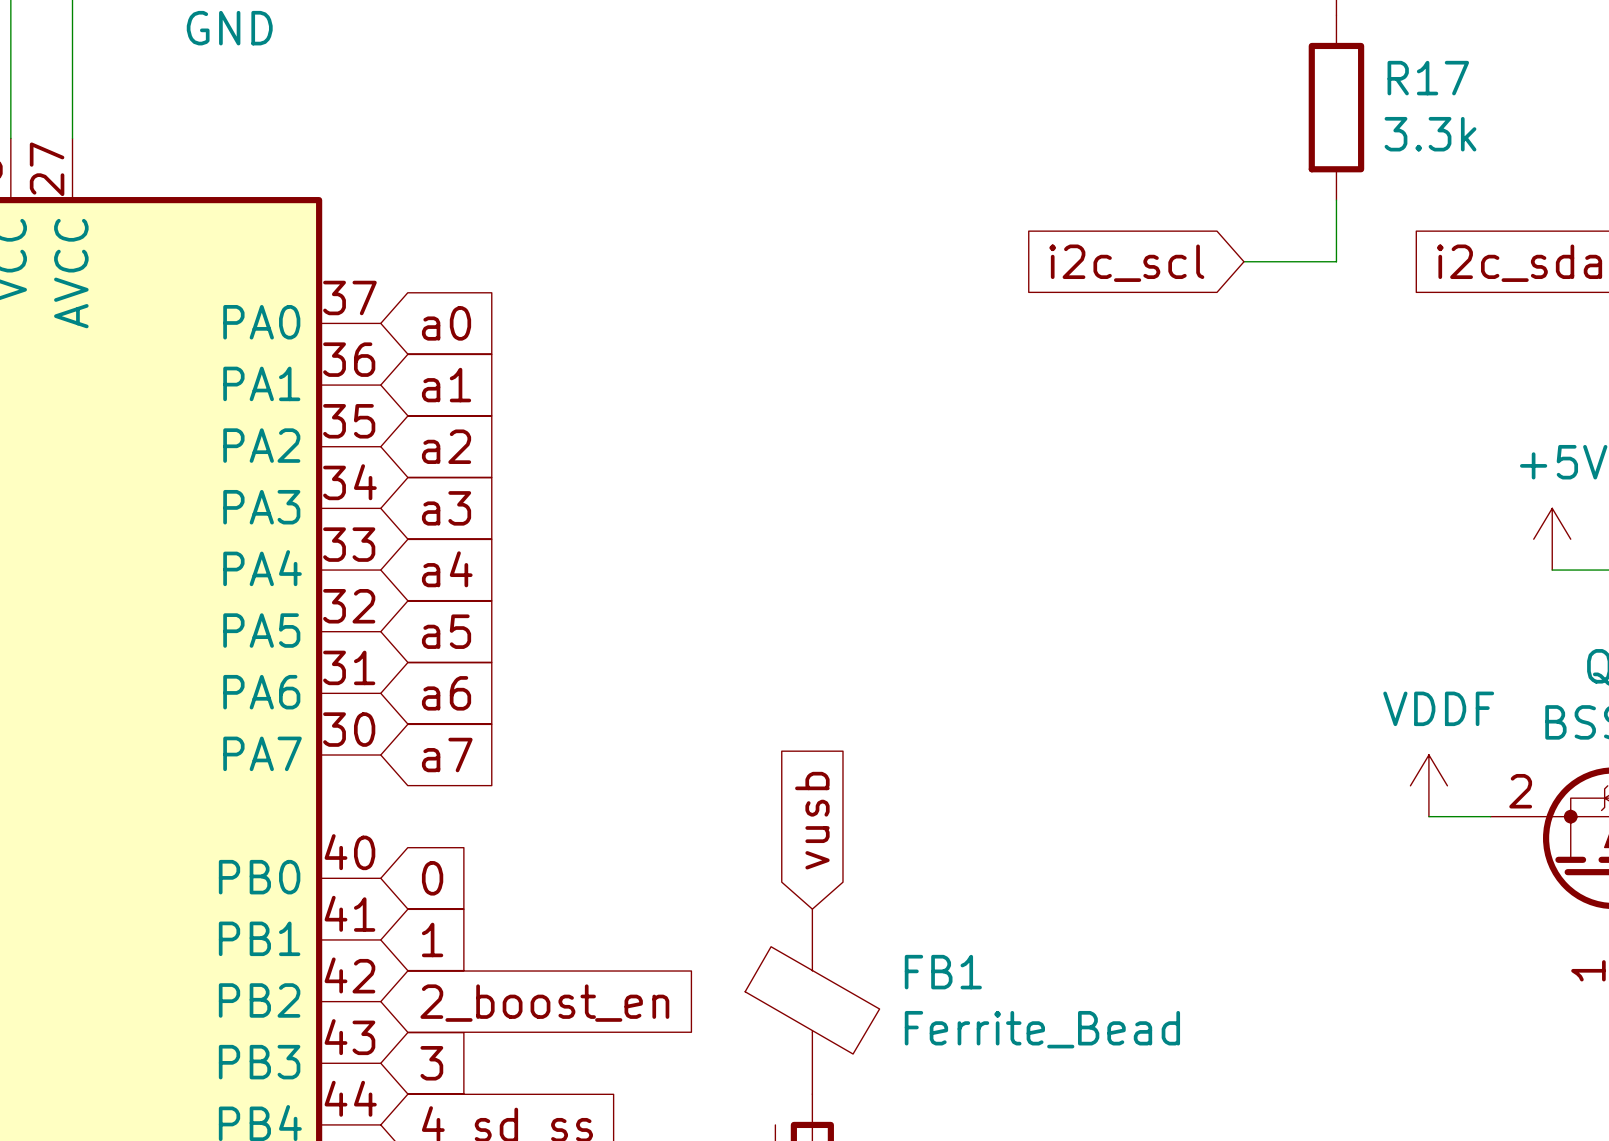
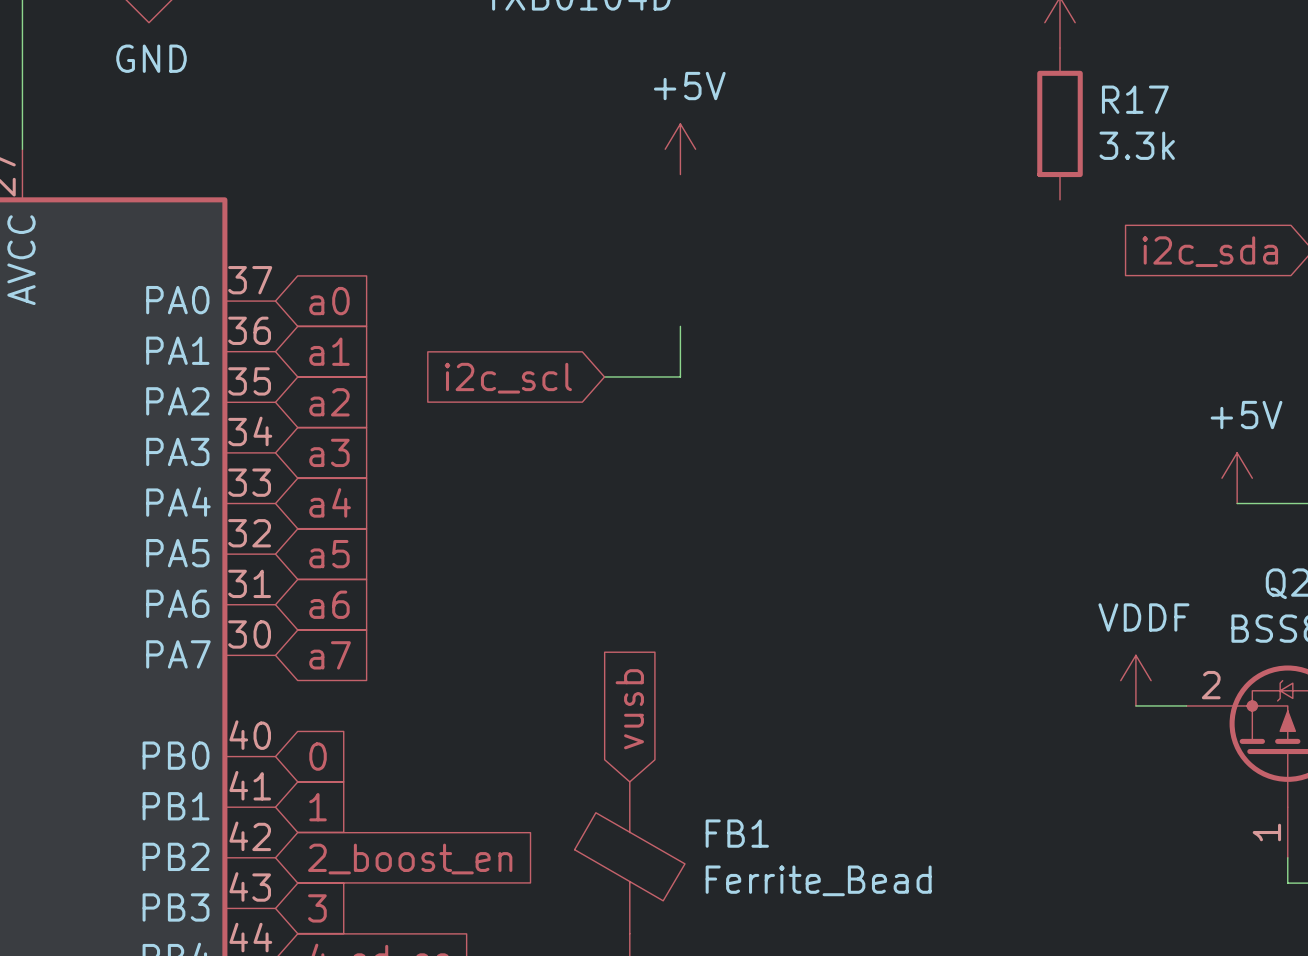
power symbol: none -> +5V (680, 149)
wire: (1336, 200) (1336, 261) (1243, 261) -> (680, 326) (680, 376) (604, 376)
global label position: i2c_scl (1126, 263) -> i2c_scl (508, 378)

